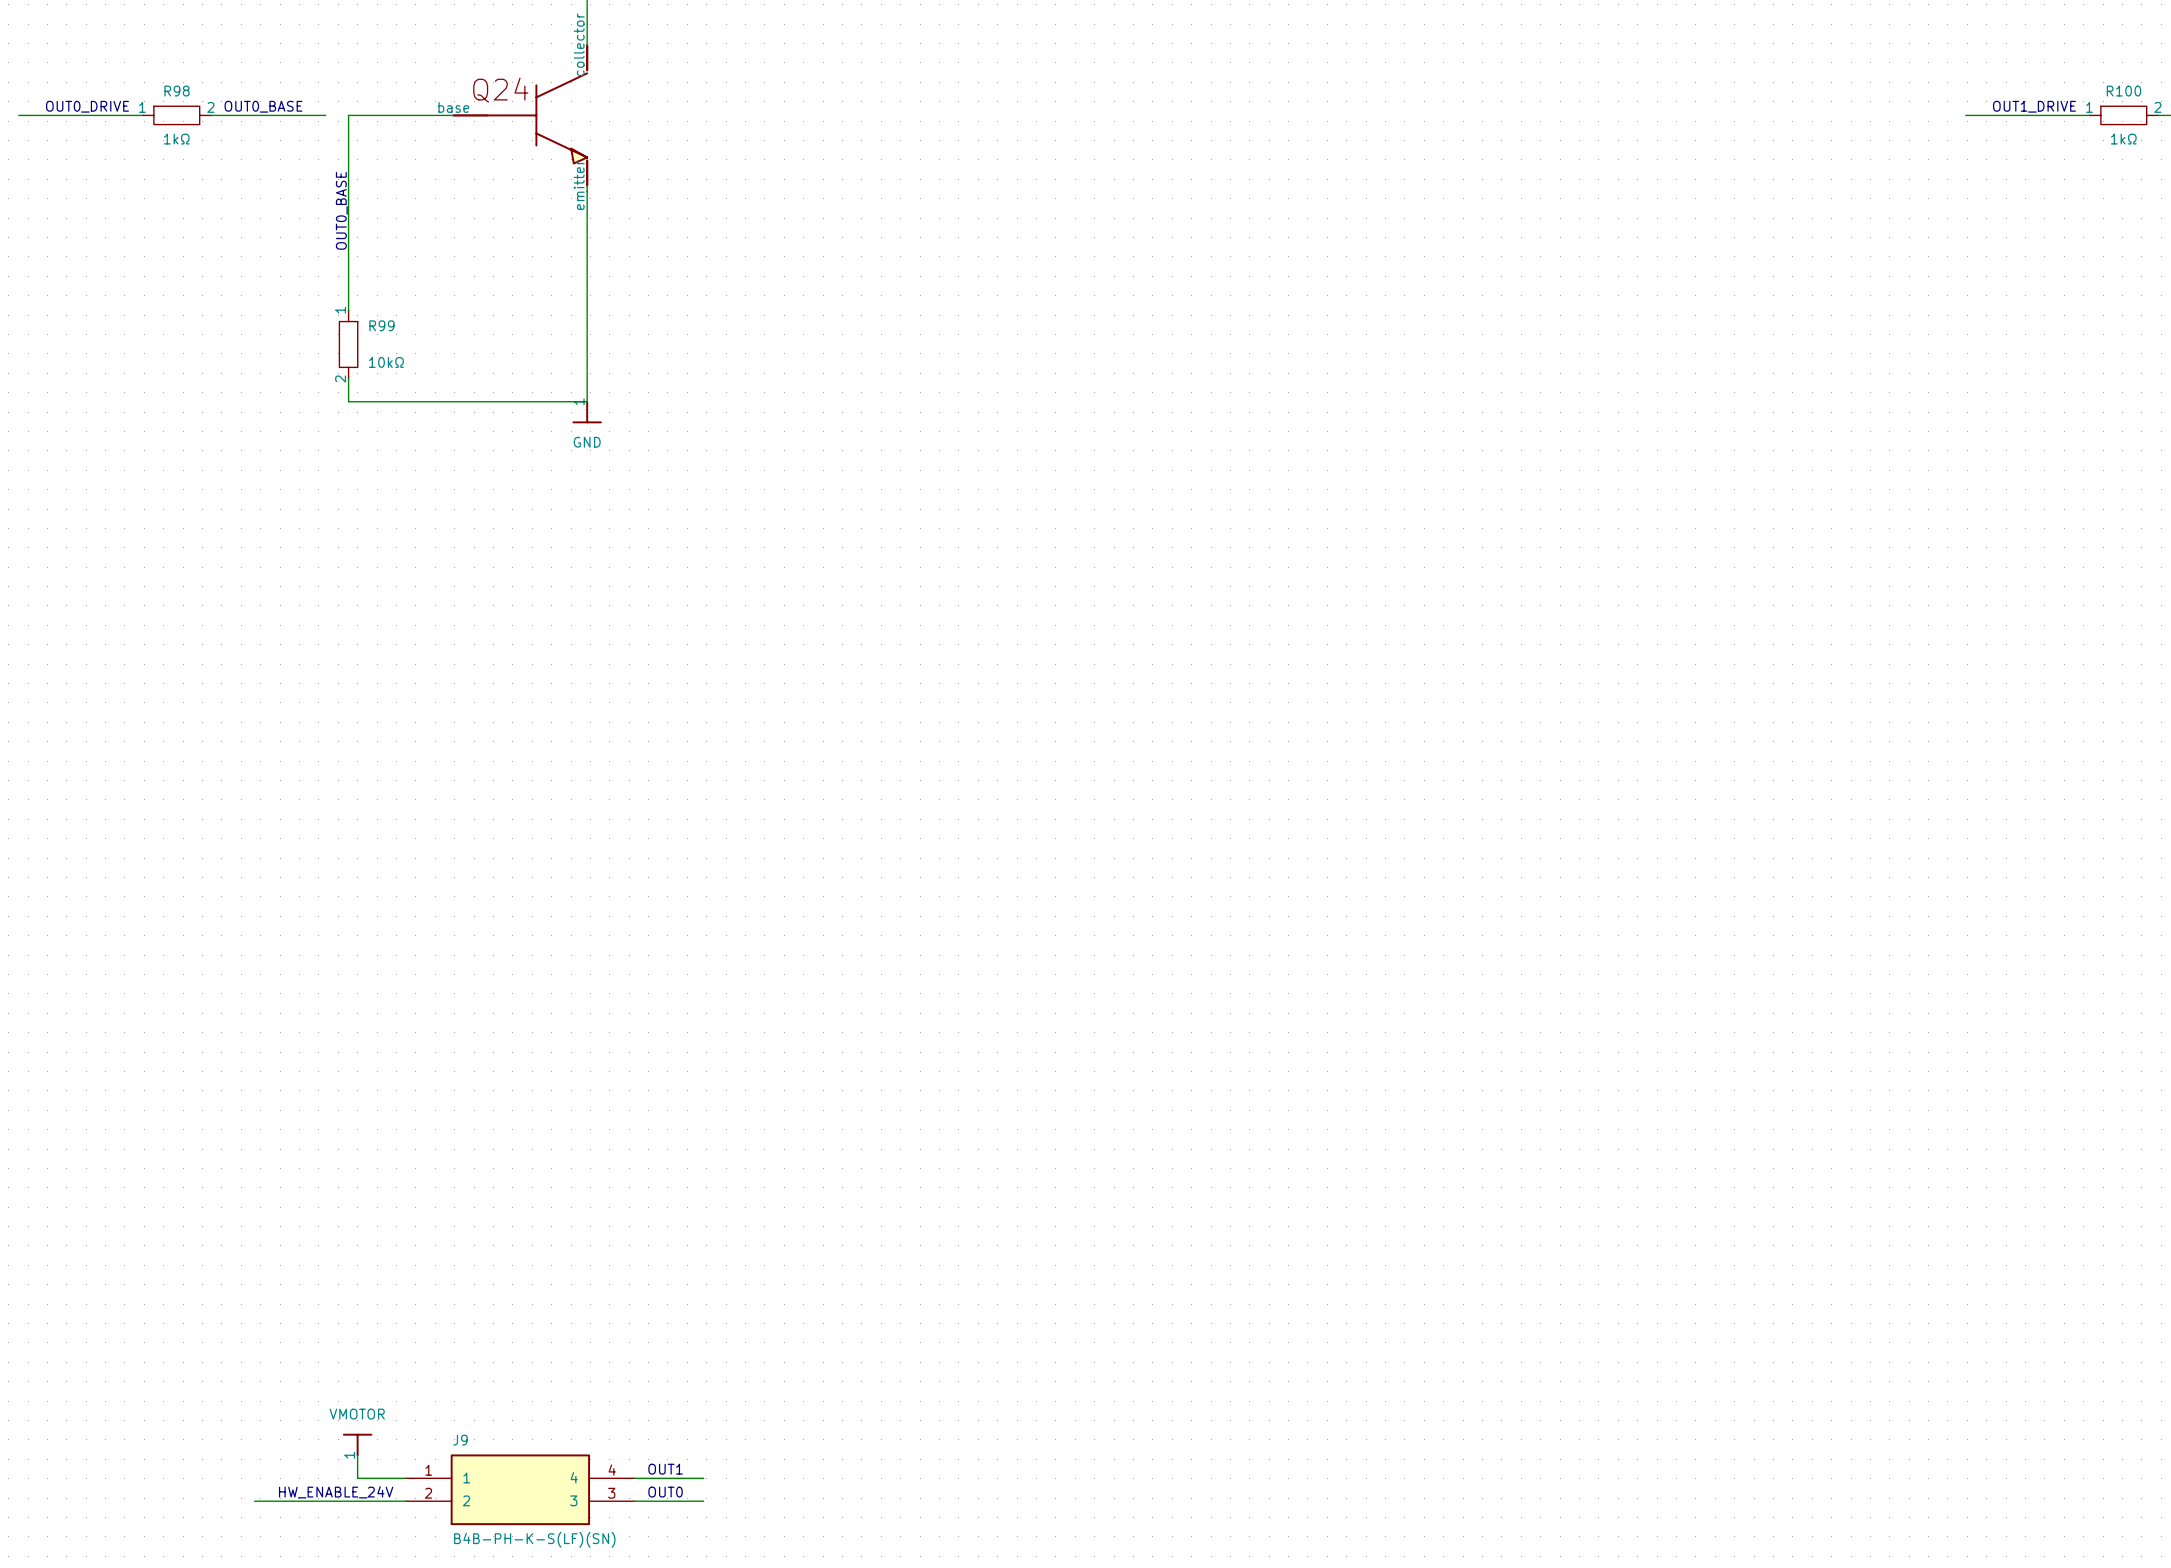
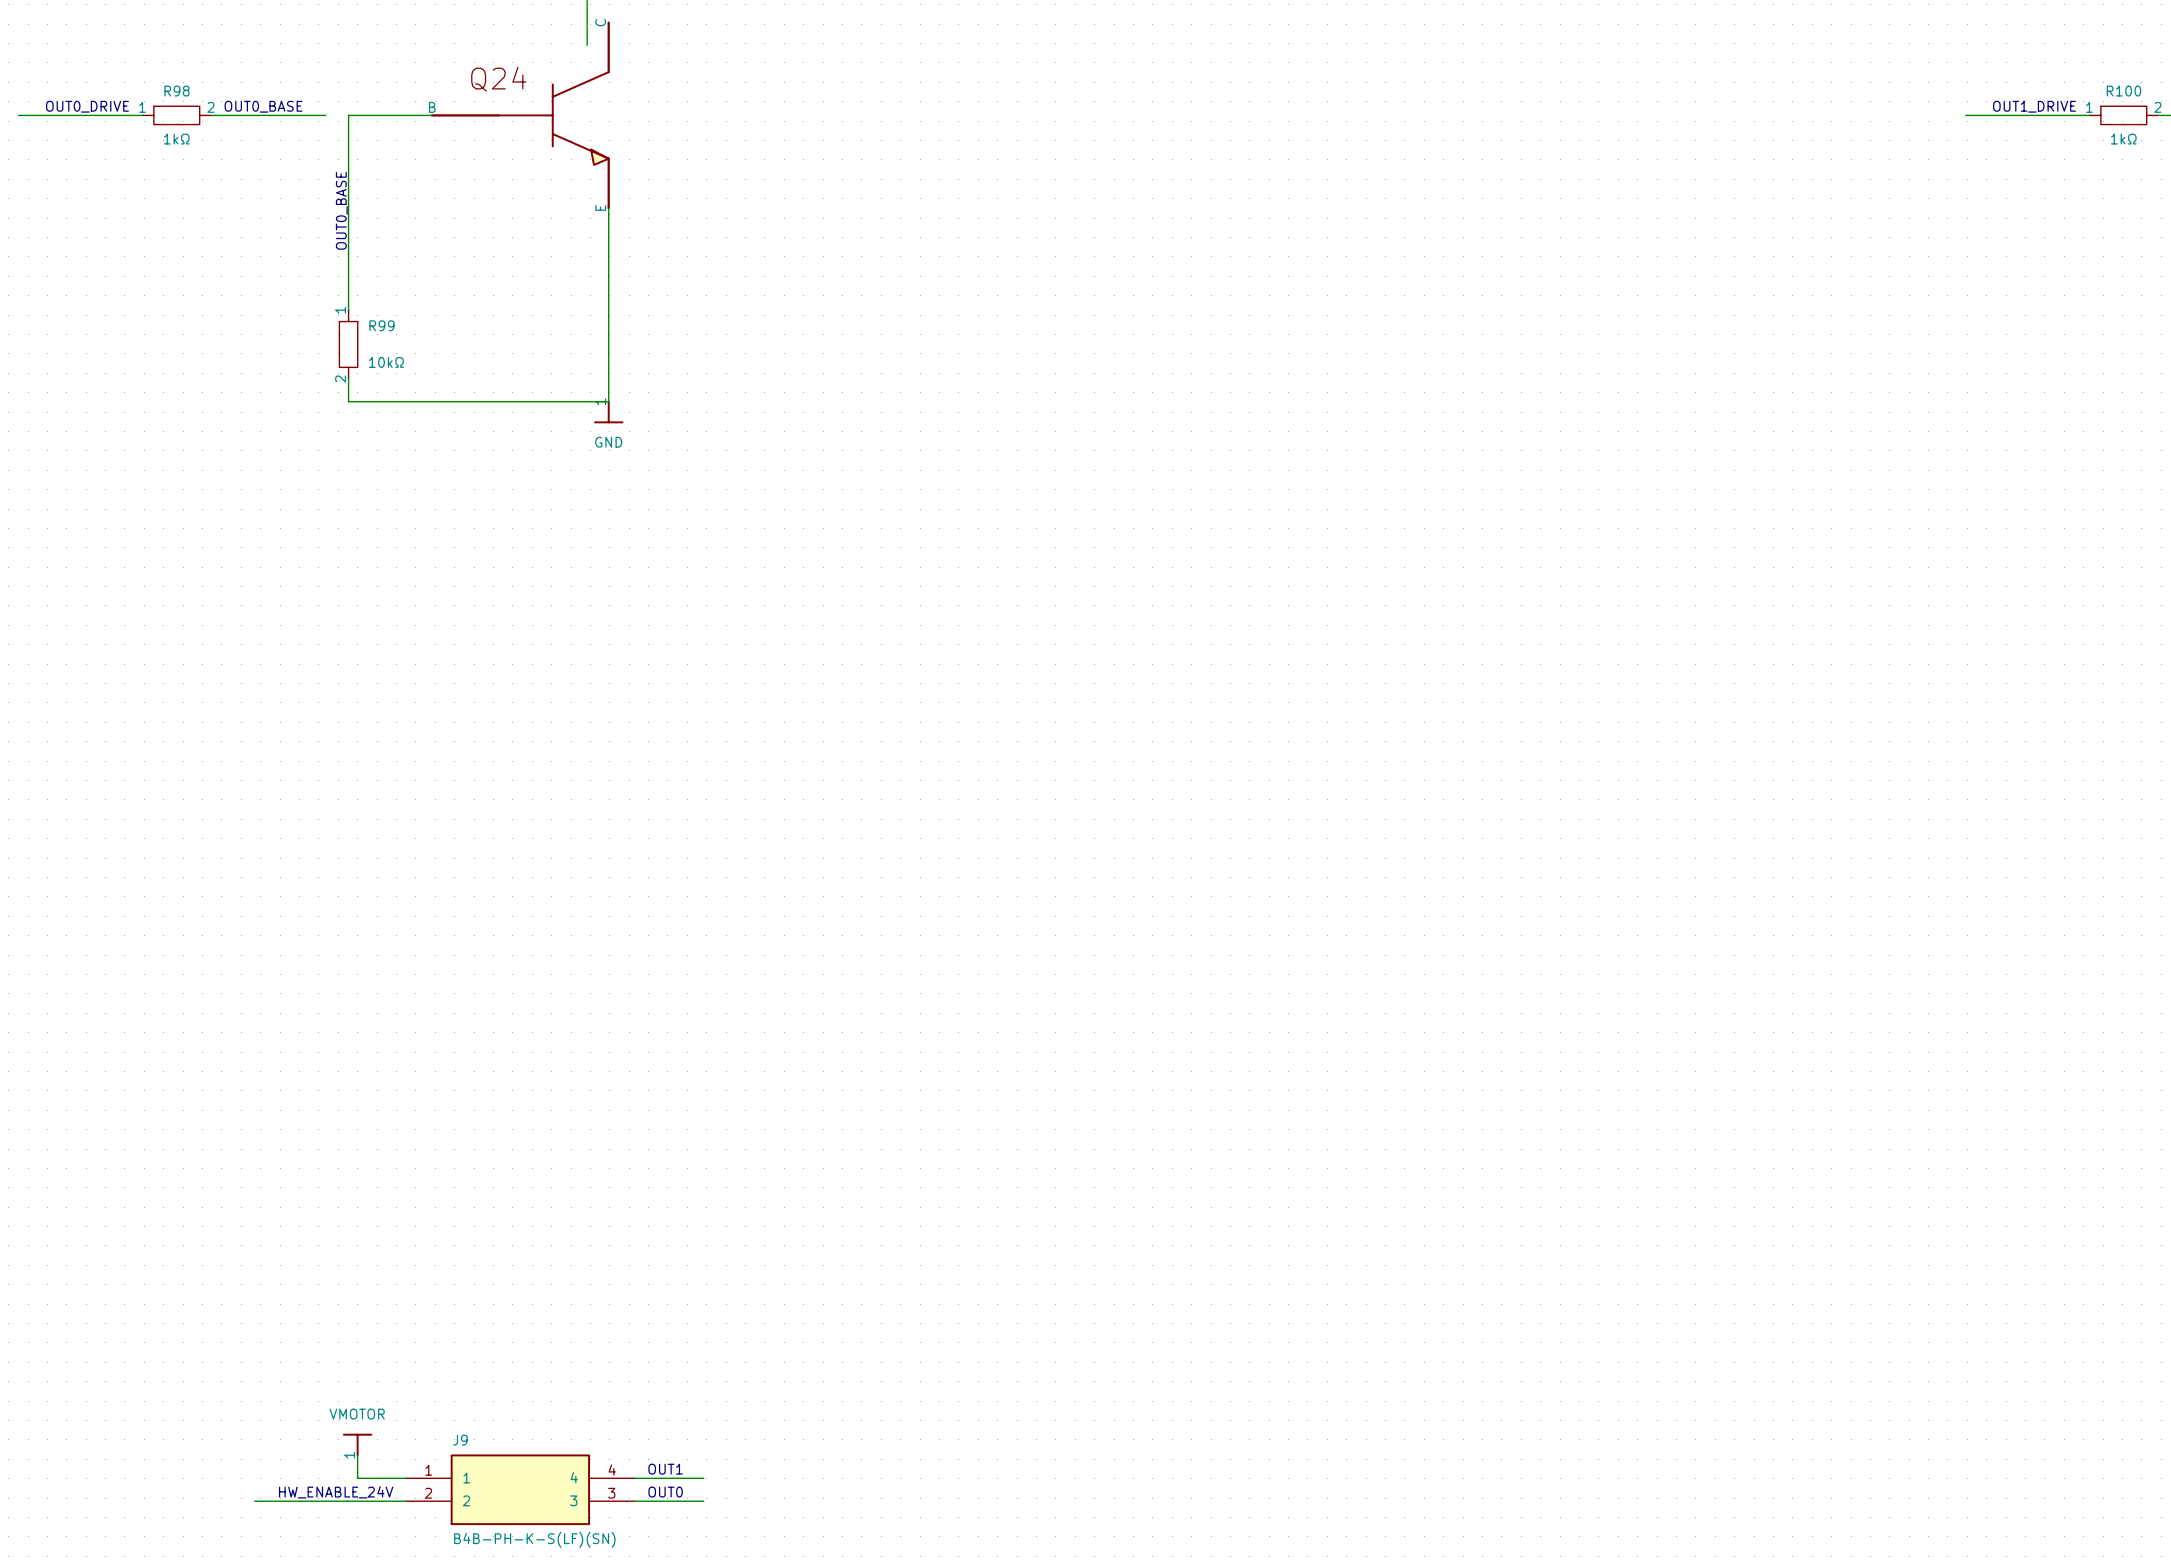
part symbol: [452, 44, 589, 187] -> [430, 21, 610, 210]
wire: (587, 185) (587, 401) -> (608, 208) (608, 401) (587, 401)
GND position: (587, 412) -> (608, 412)

